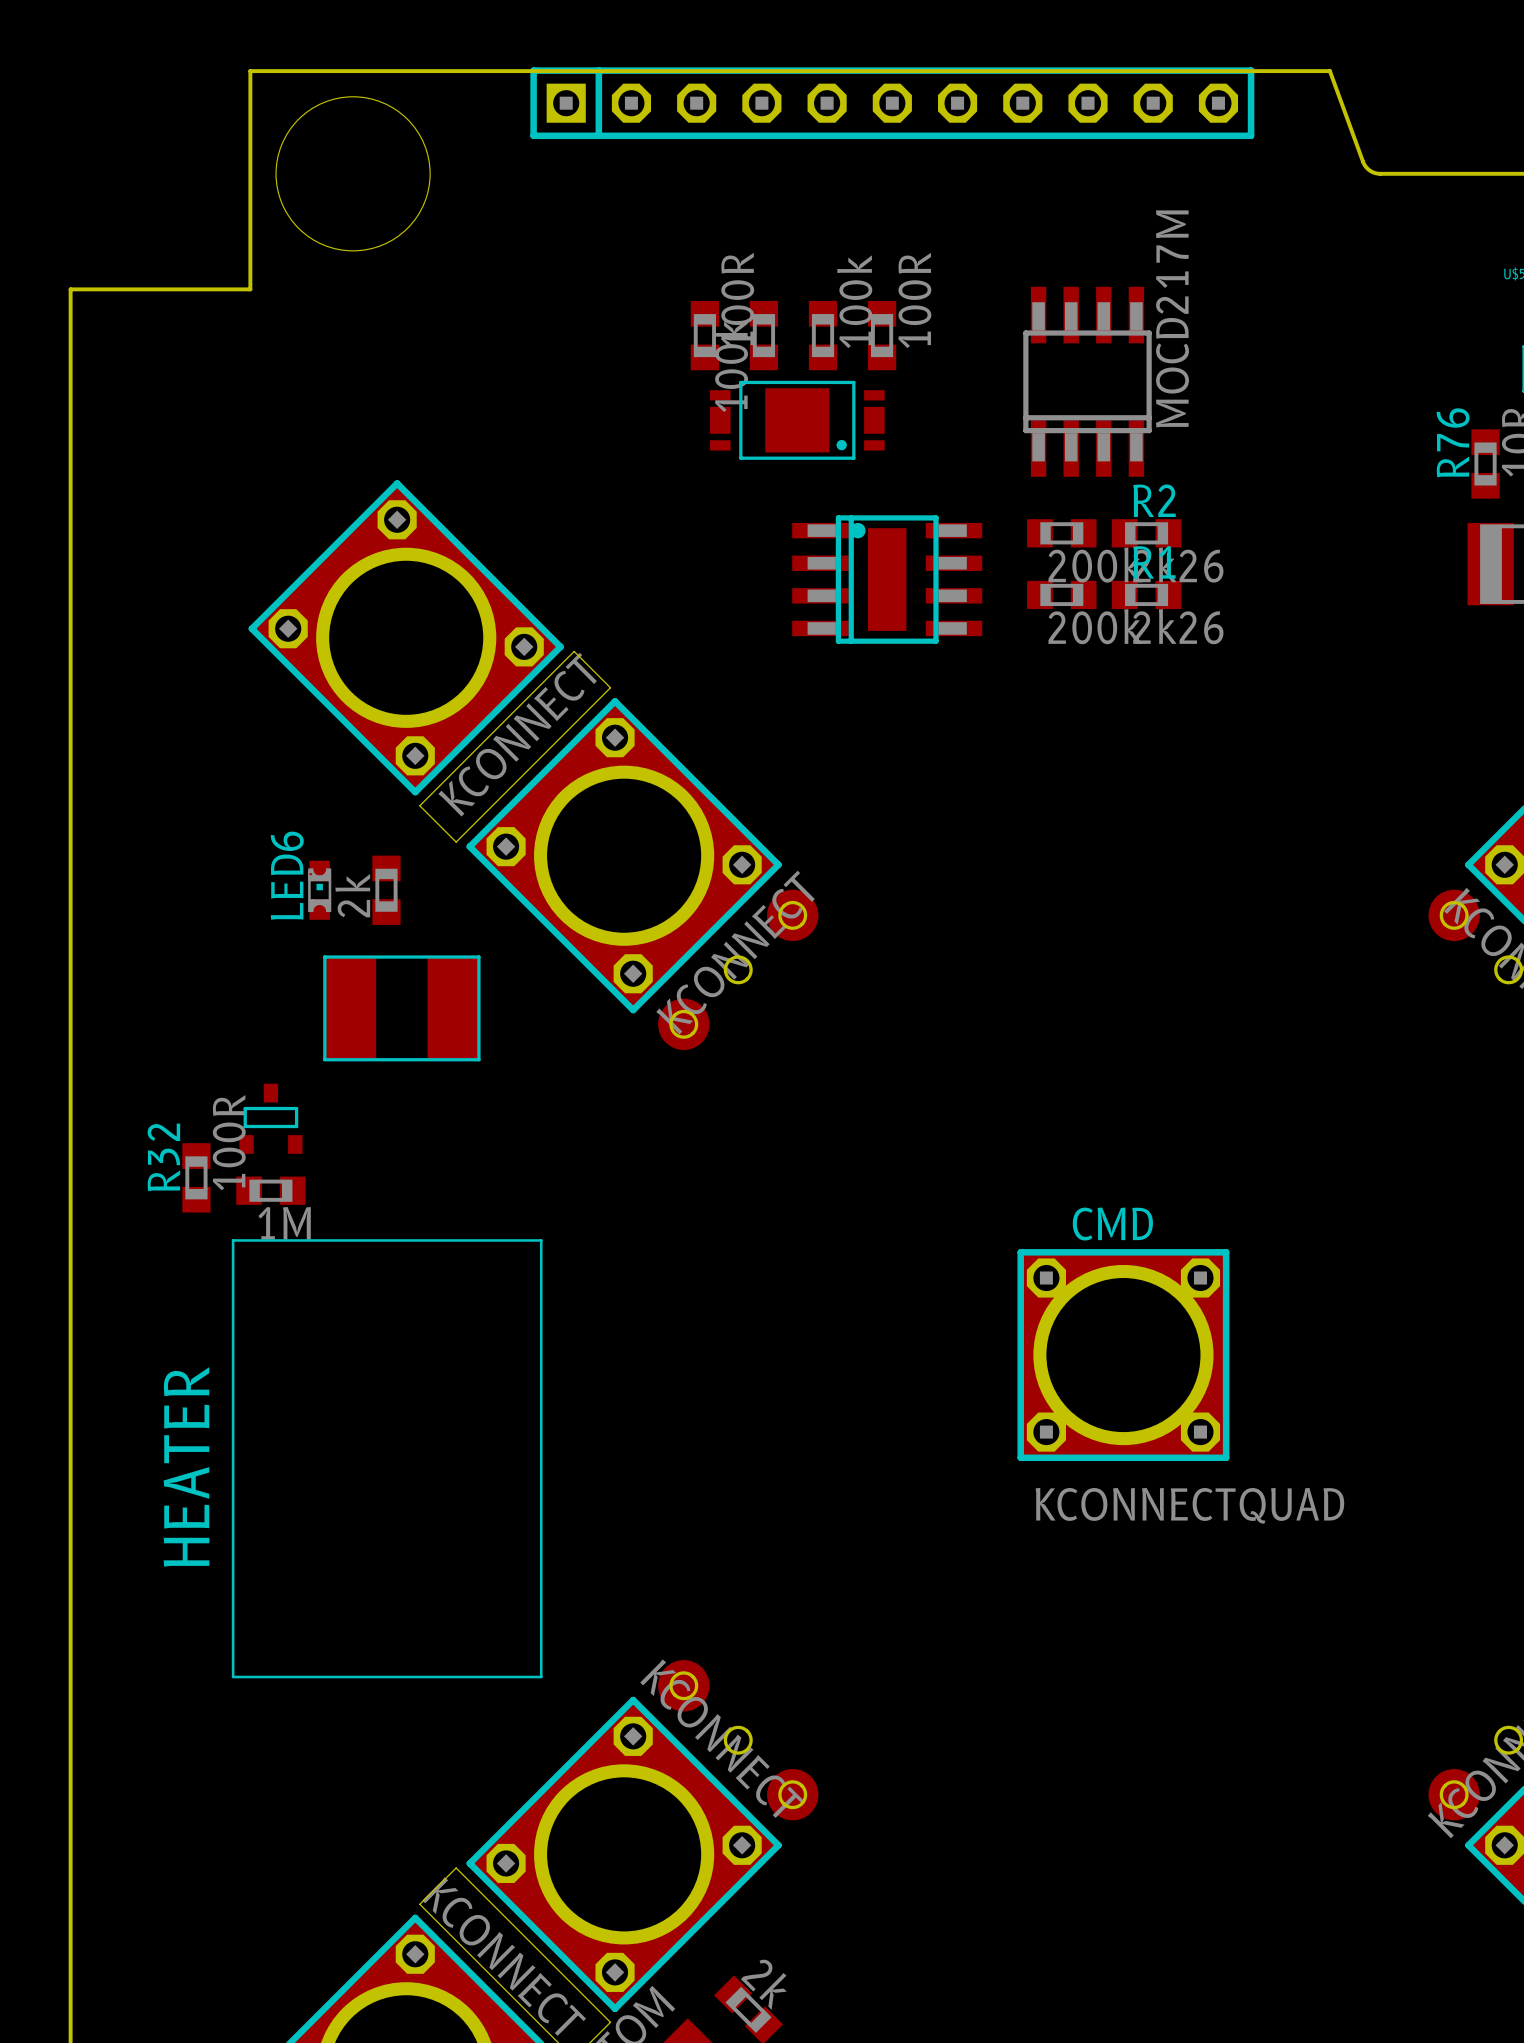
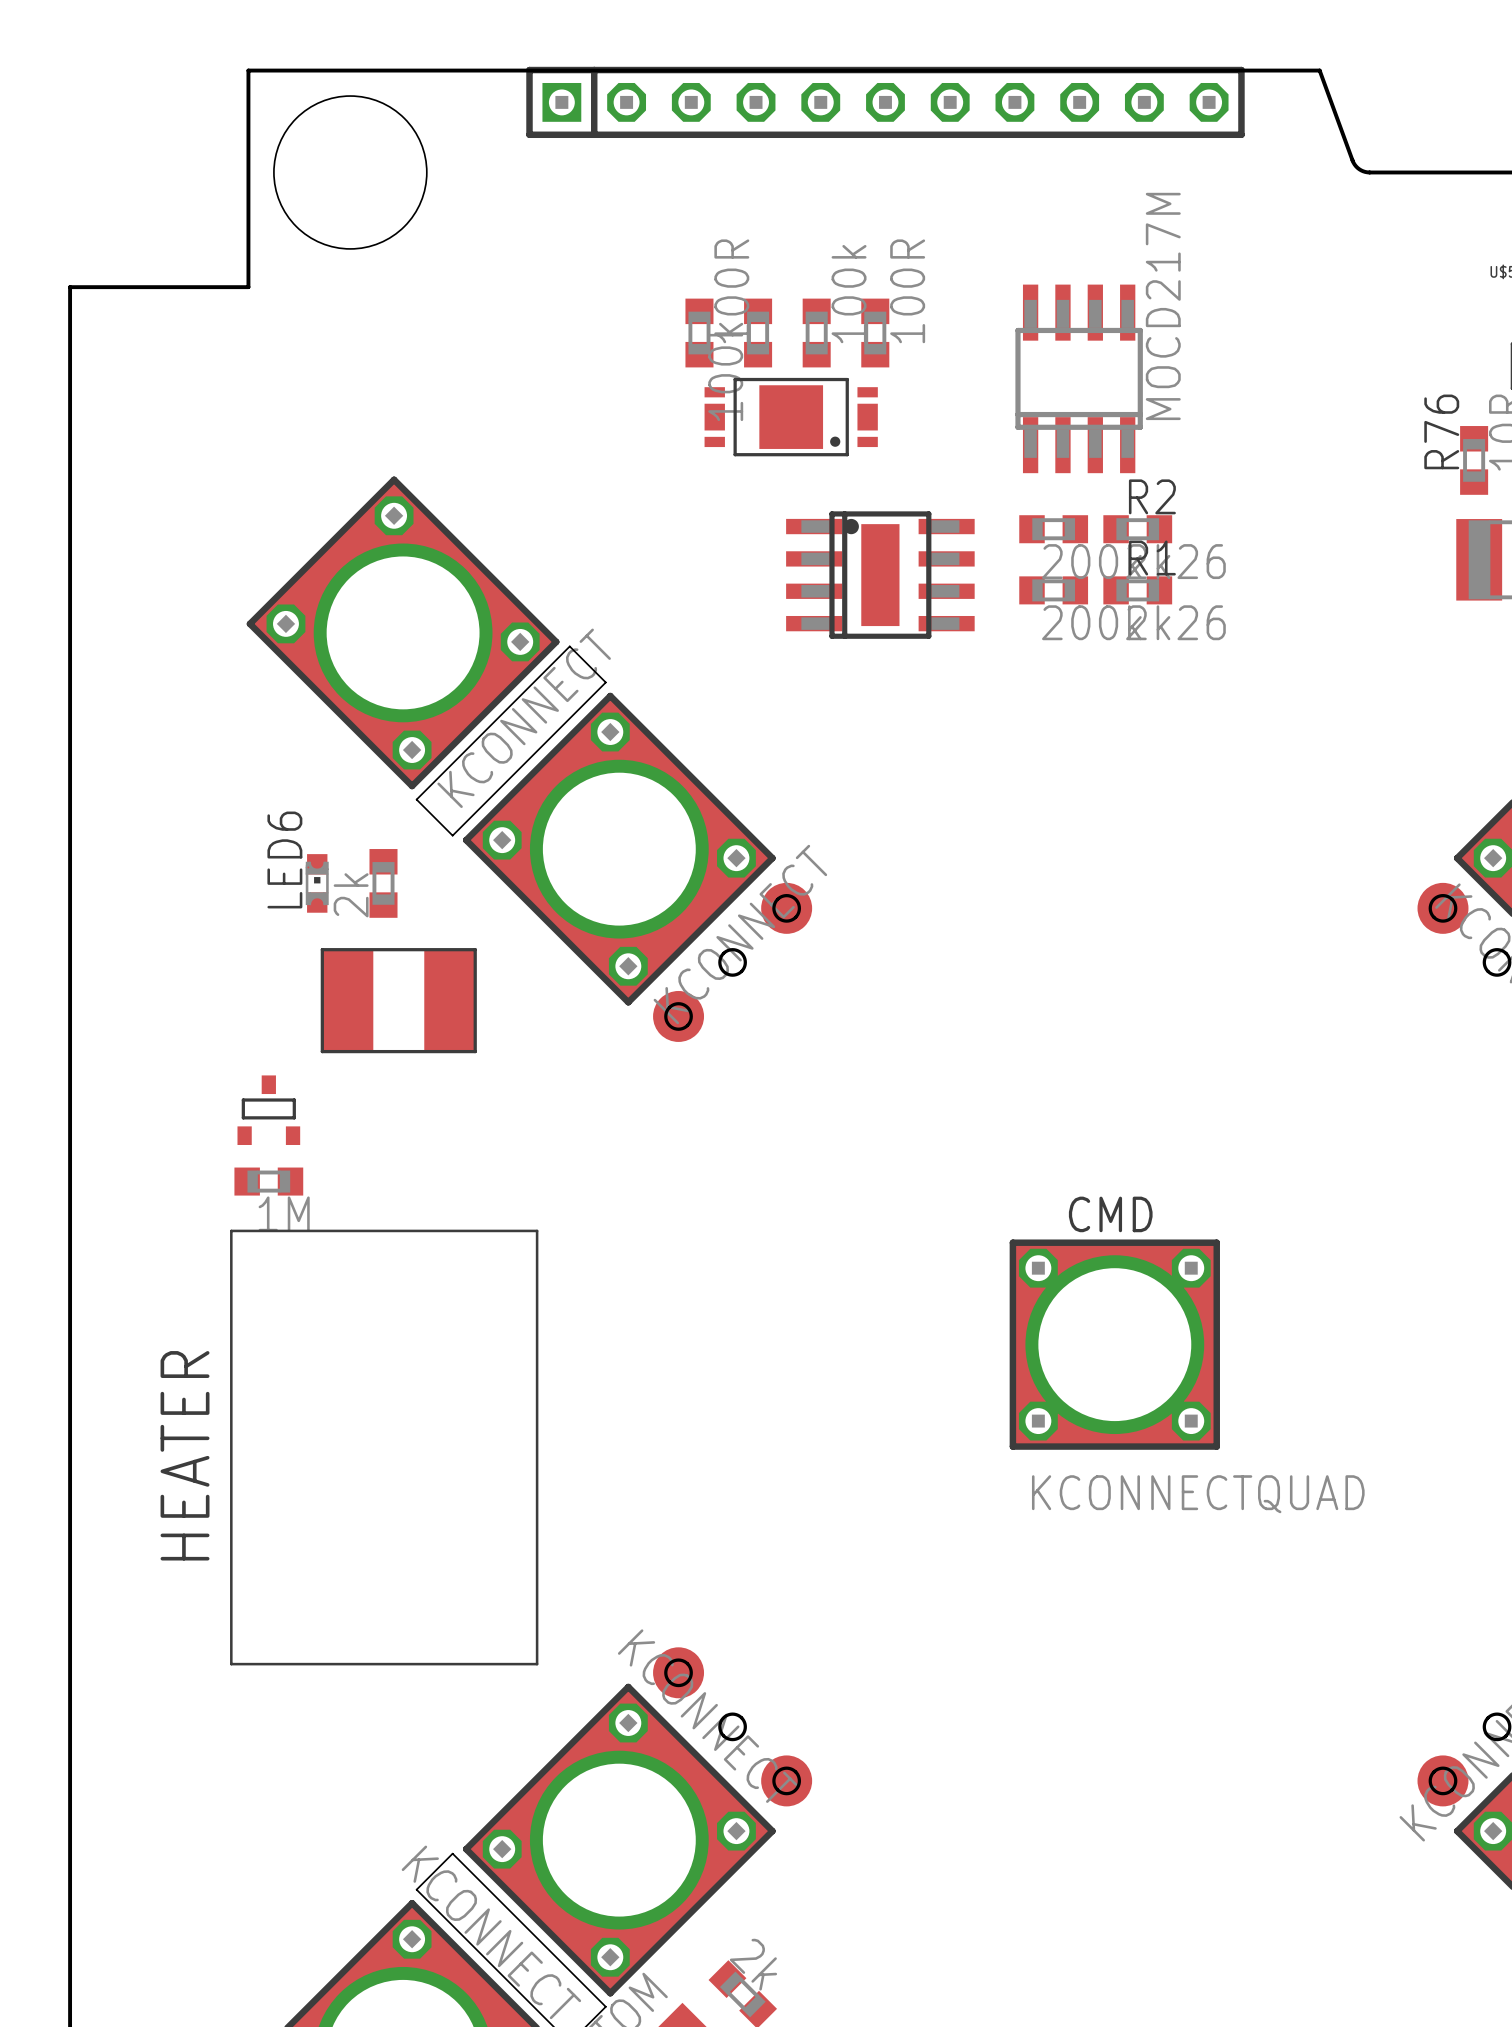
R32: 100R (196, 1177) -> none

